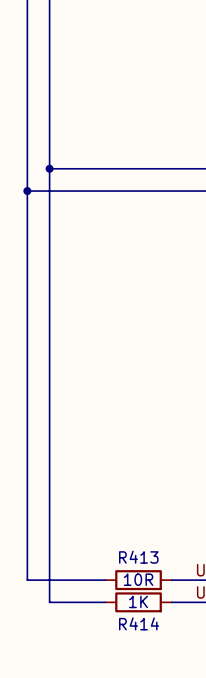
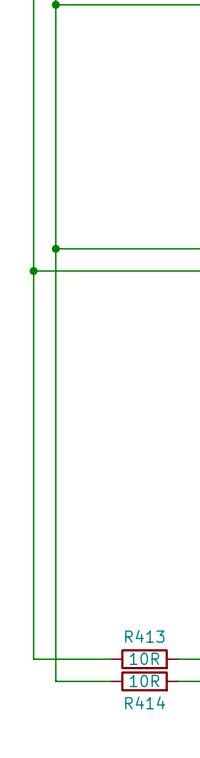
R414 value: 1K (138, 601) -> 10R (144, 680)

